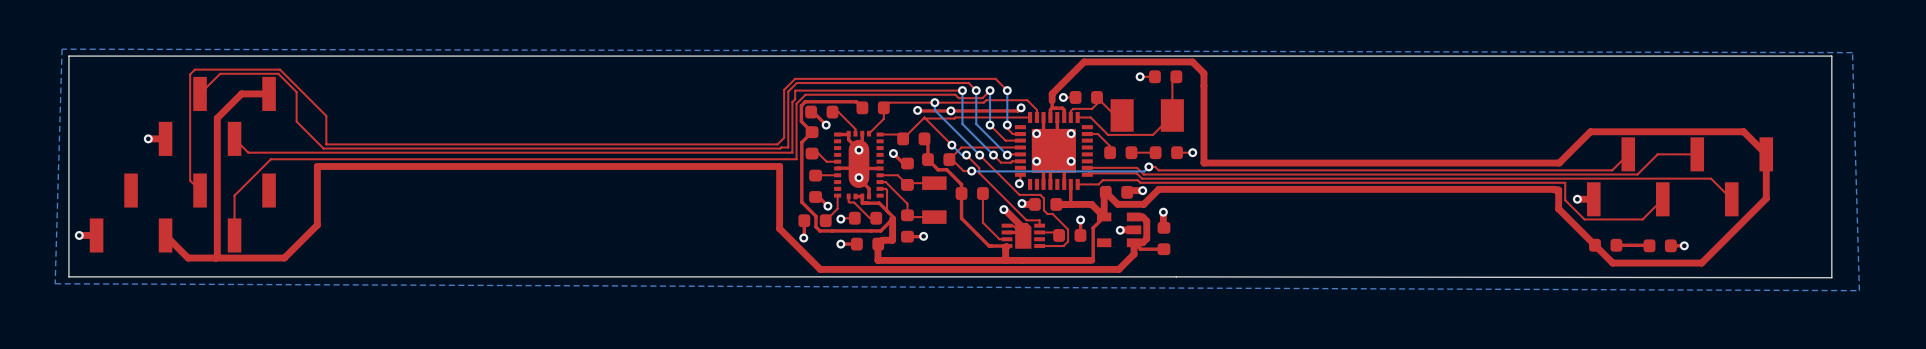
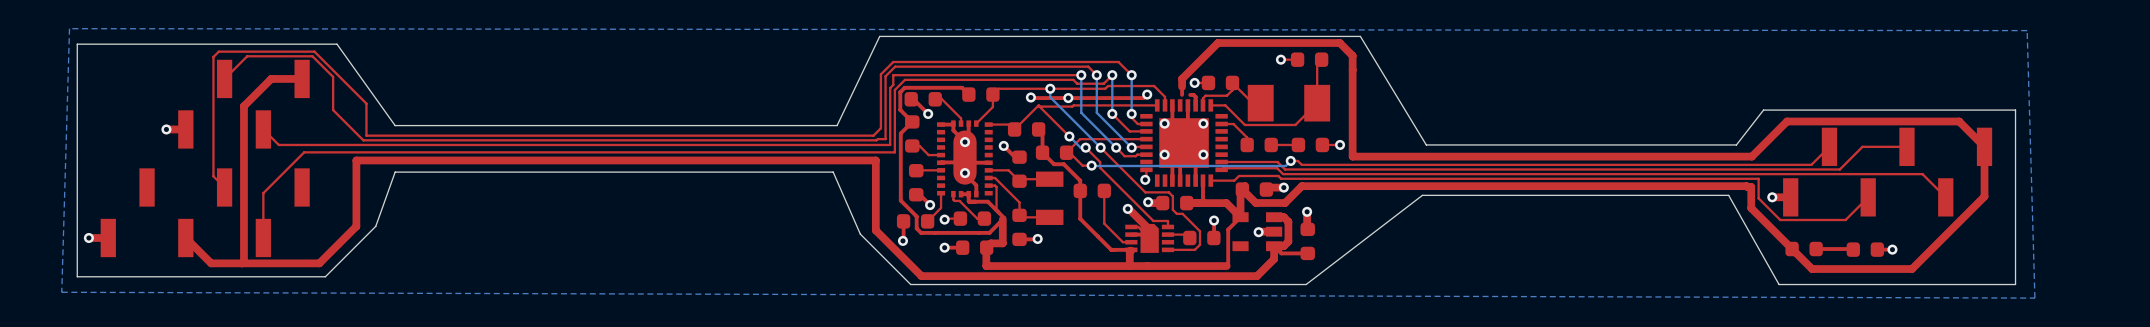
bottom zone outline: (62, 49) (1852, 52) (1859, 290) (55, 283) -> (69, 28) (2027, 30) (2034, 298) (61, 292)
board edge: (783, 56) (68, 56) (68, 62) -> (879, 36) (837, 125) (395, 125) (337, 44) (77, 44)
board edge: (1210, 56) (1831, 56) (1831, 277) (1162, 276) -> (1360, 36) (1426, 144) (1736, 144) (1763, 110) (2015, 110) (2015, 284) (1779, 284) (1728, 195) (1422, 195) (1306, 284)
top track: (1059, 108) (1050, 109) (1050, 117) -> none
board edge: (68, 269) (68, 276) (810, 276) -> (77, 276) (325, 276) (375, 226) (395, 172) (833, 172) (860, 234) (910, 284)

